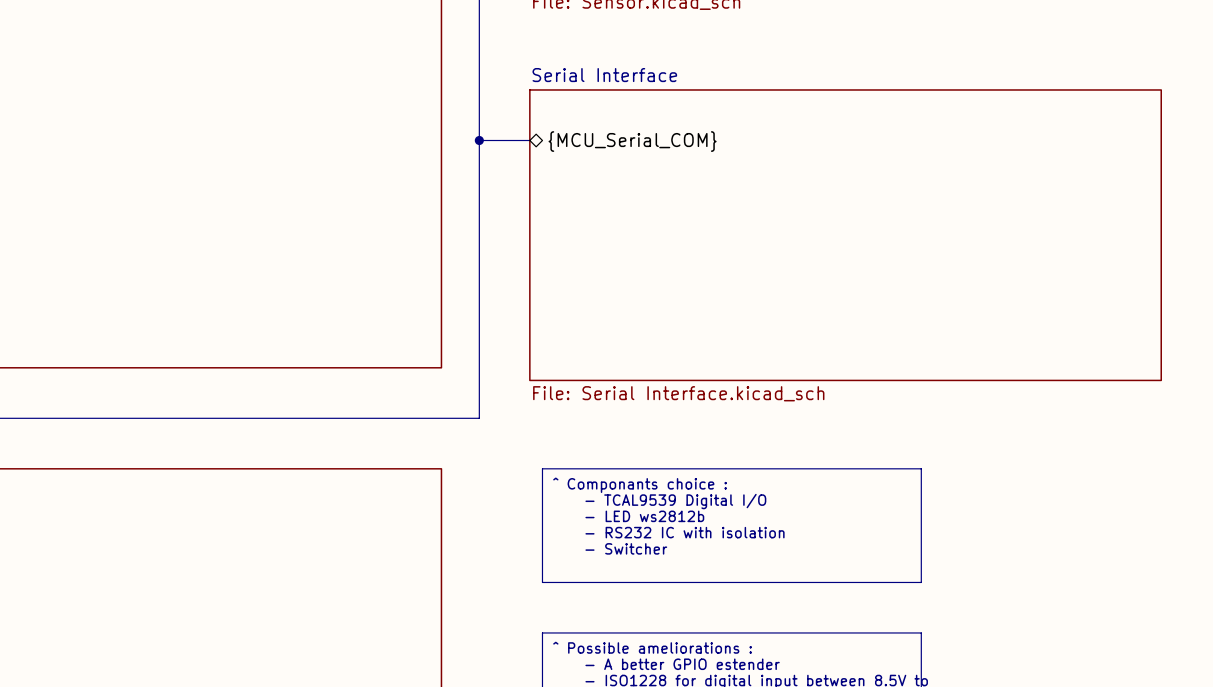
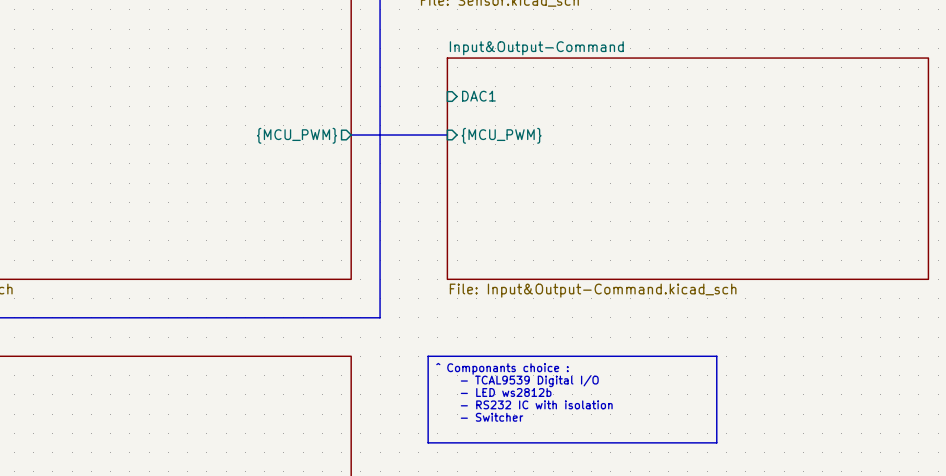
sheet pin: none -> DAC1 (478, 96)
bus: (479, 140) (529, 140) -> none
junction: (479, 140) -> none
sheet pin: {MCU_Serial_COM} (632, 141) -> none
bus: none -> (351, 135) (447, 135)
sheet pin: none -> {MCU_PWM} (296, 135)
sheet pin: none -> {MCU_PWM} (501, 135)
sheet Input&Output-Command: none -> File: Input&Output-Command.kicad_sch (687, 168)
sheet Serial Interface: File: Serial Interface.kicad_sch (845, 235) -> none

